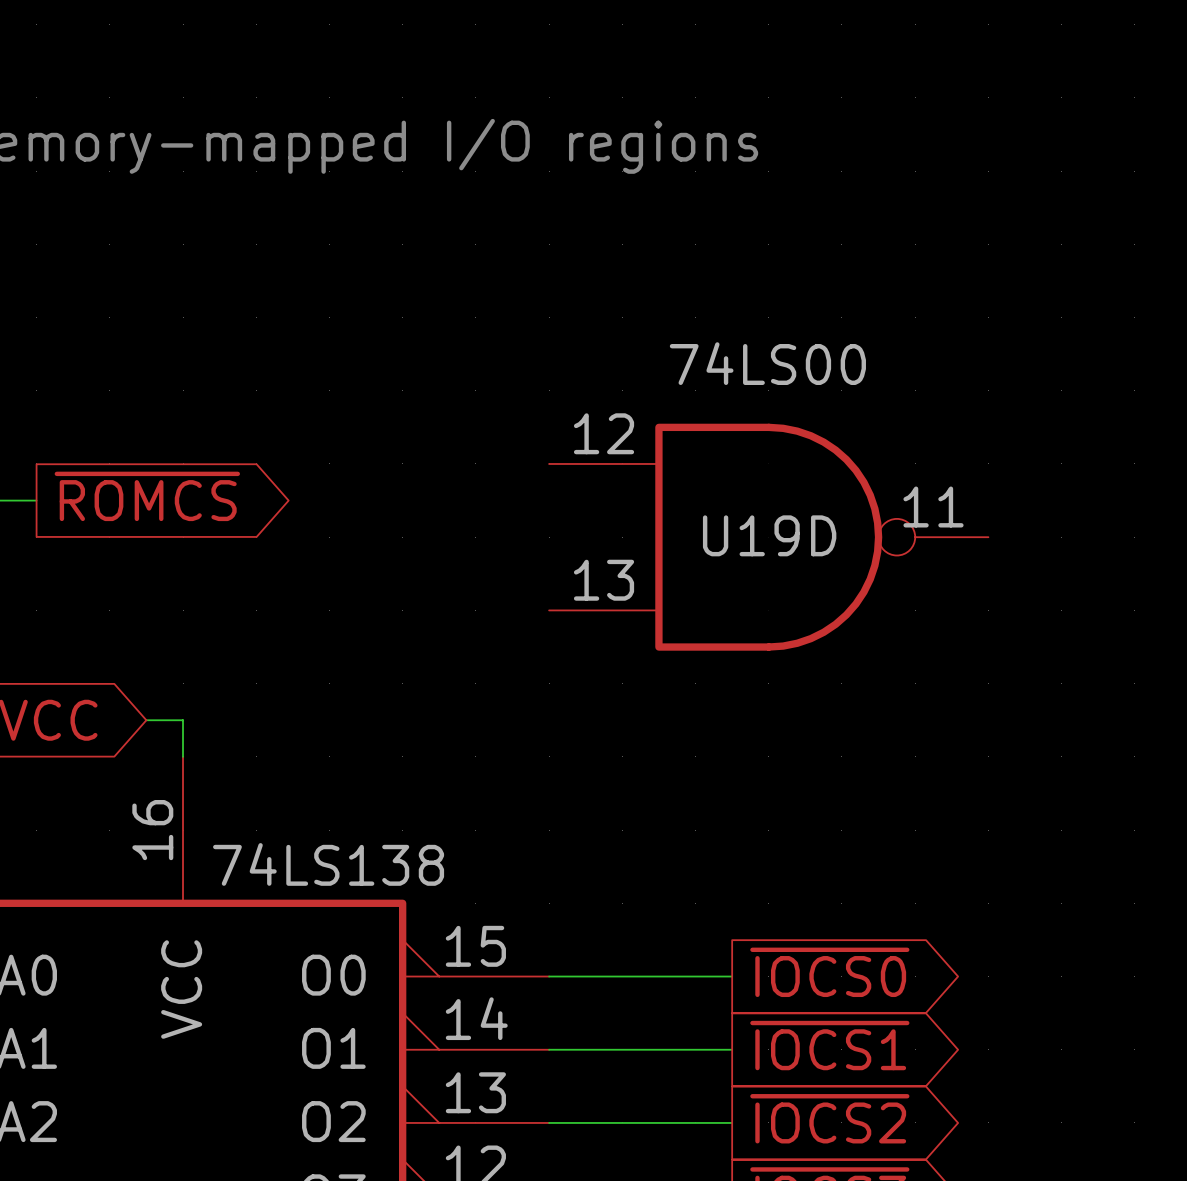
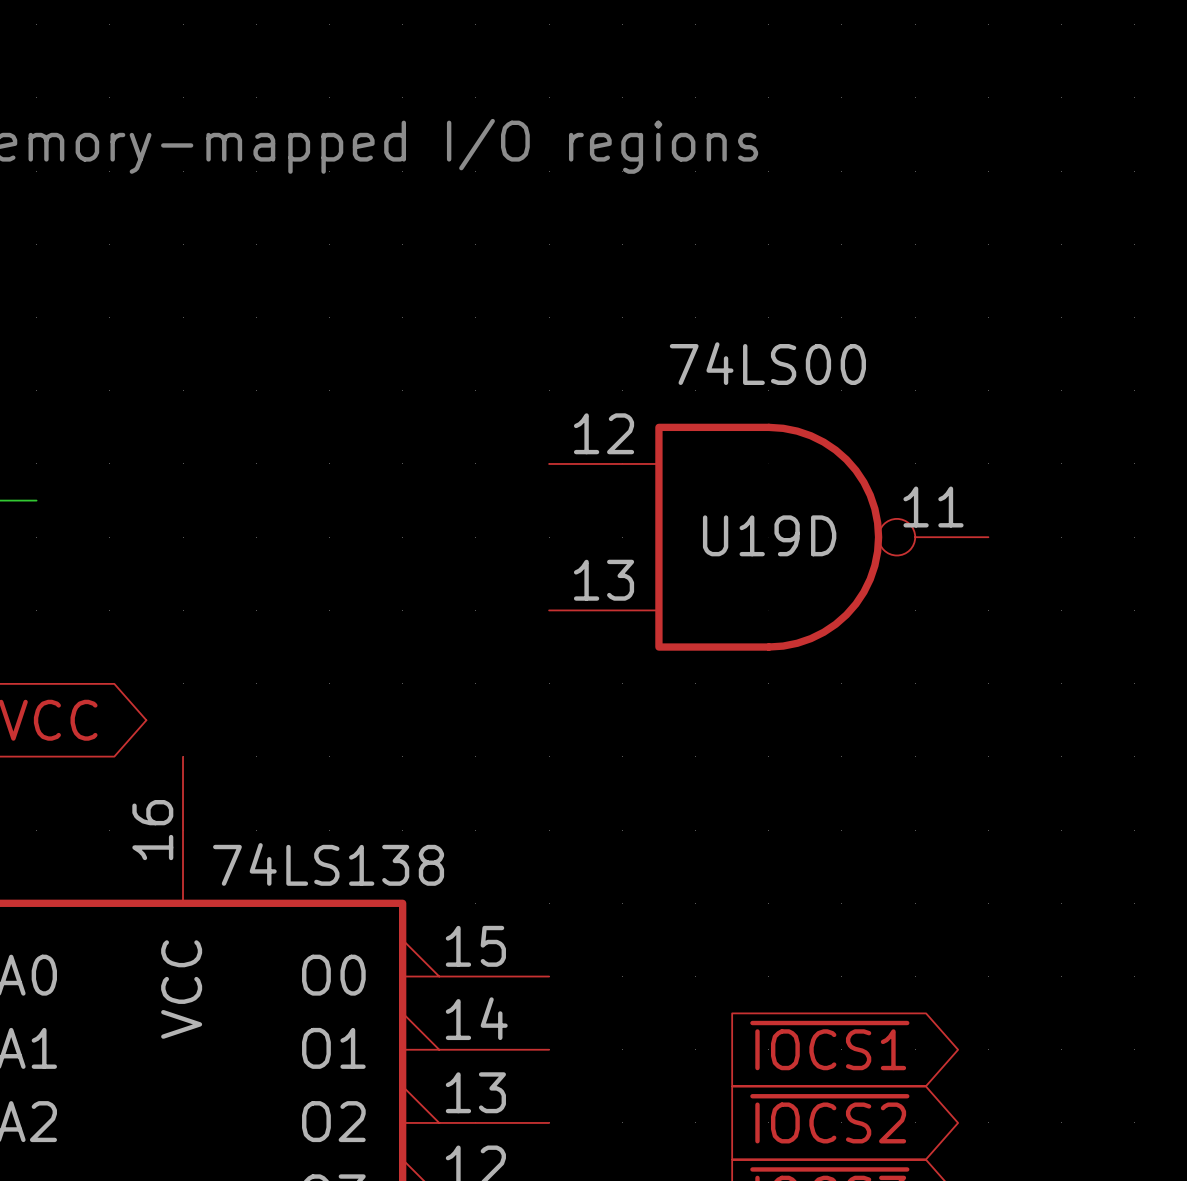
global label: ~{ROMCS} (147, 496) -> none
wire: (146, 720) (183, 720) (183, 756) -> none
global label: ~{IOCS0} (829, 972) -> none
wire: (549, 976) (732, 976) -> none
wire: (549, 1049) (732, 1049) -> none
wire: (549, 1122) (732, 1122) -> none

